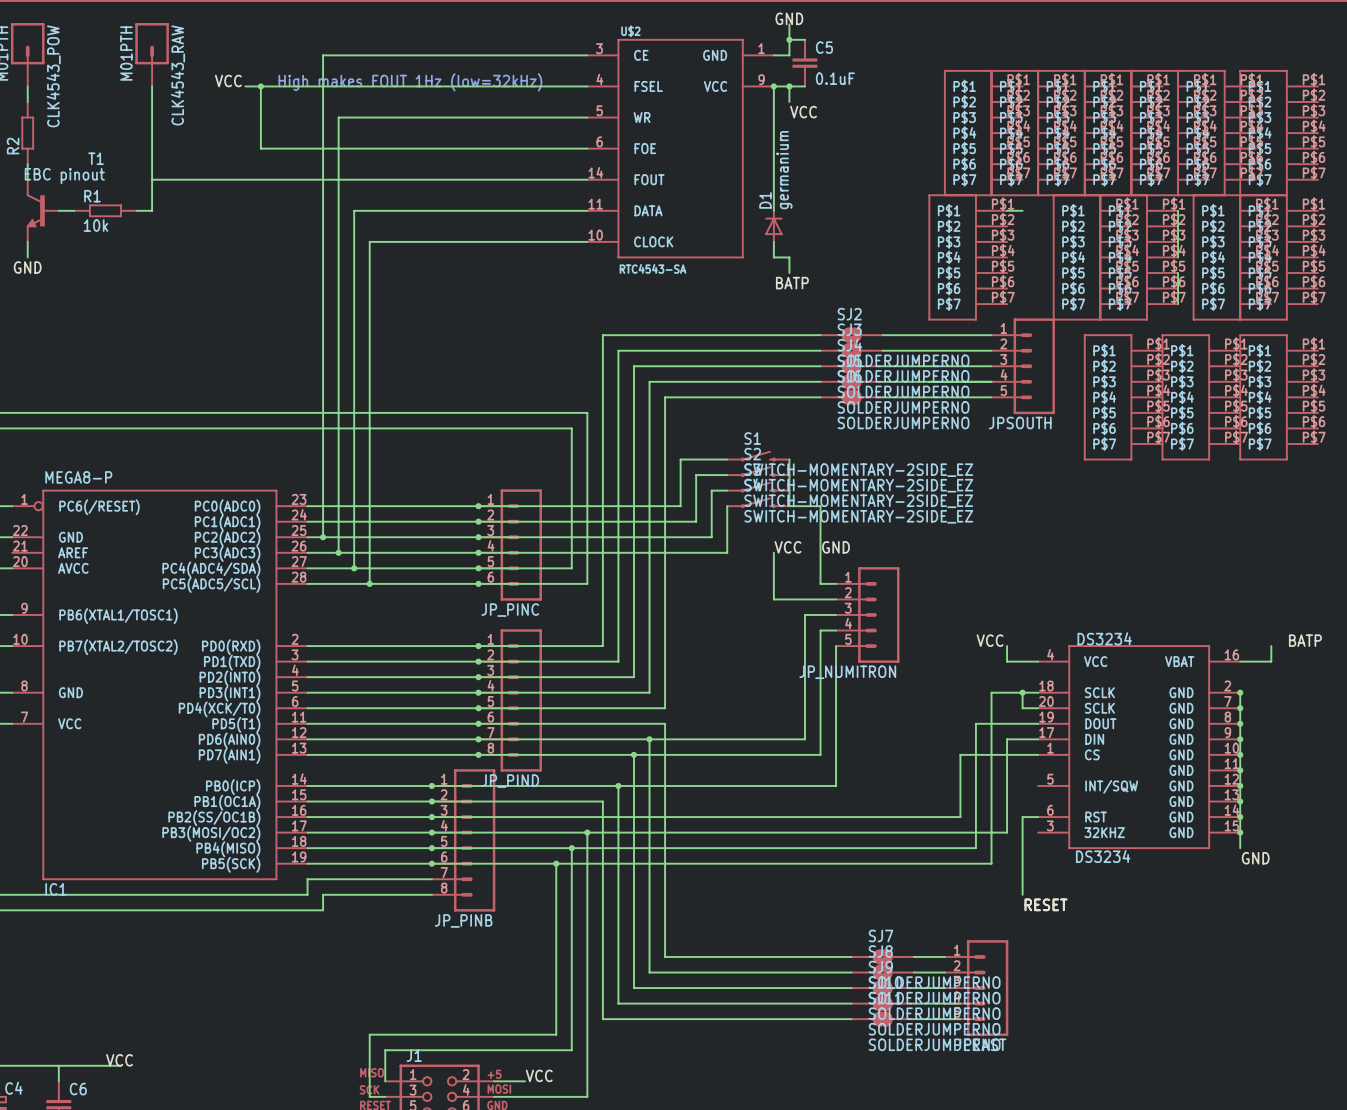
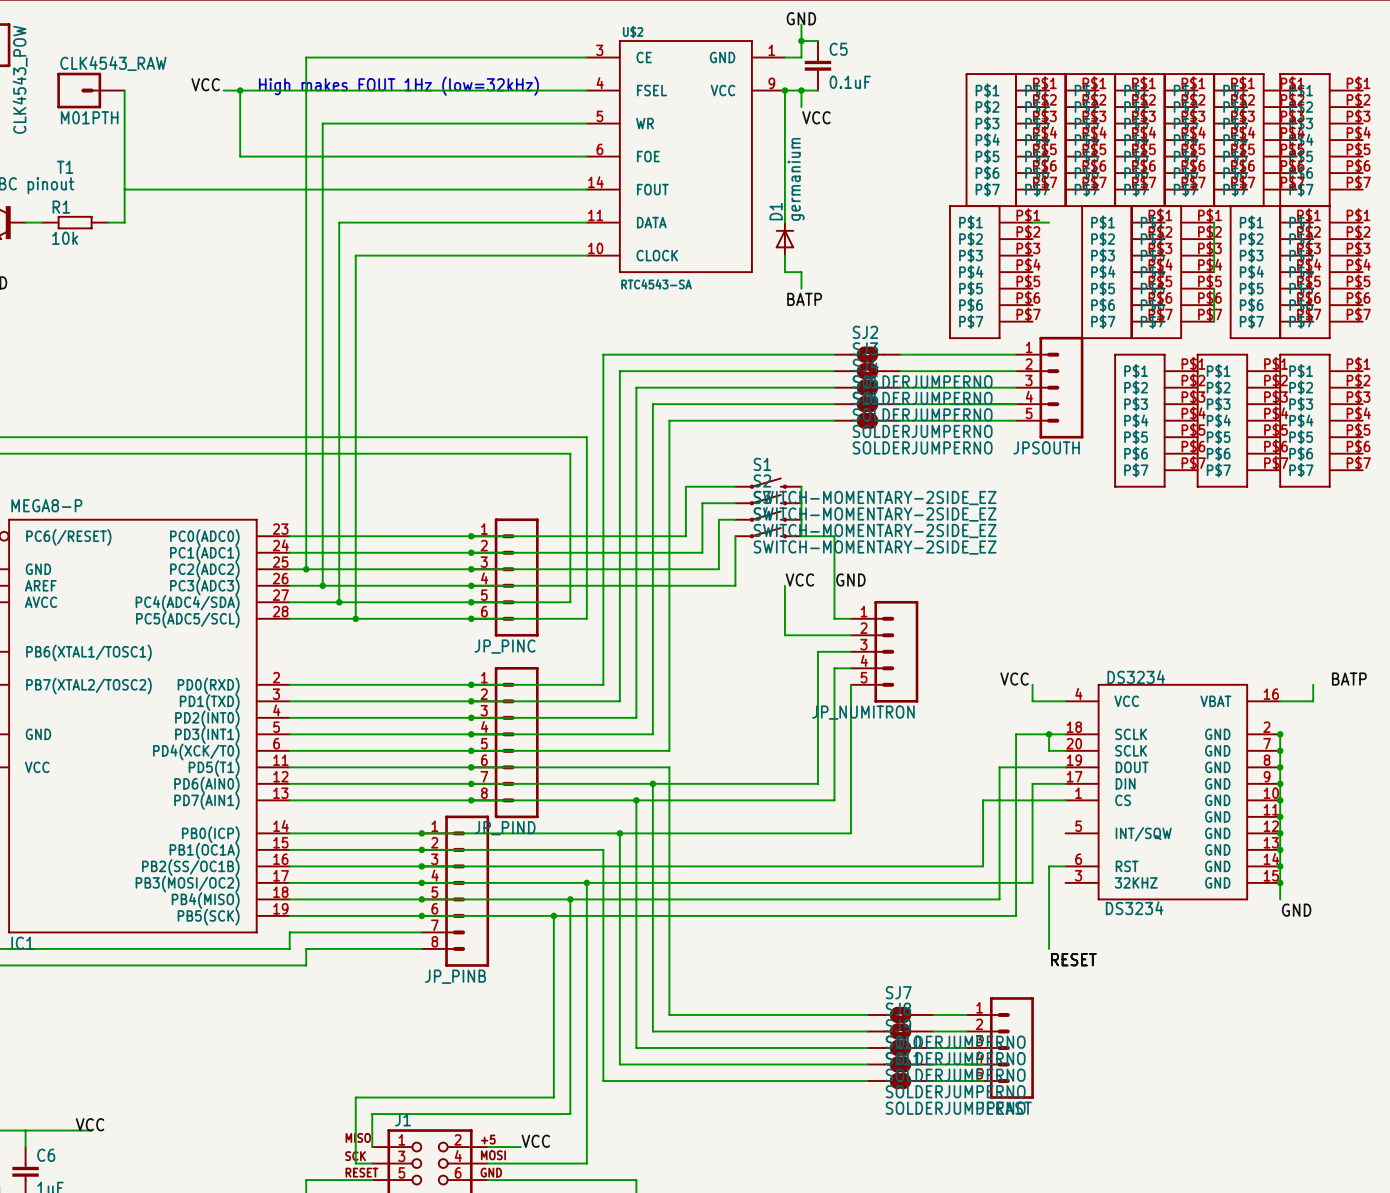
CLK4543_RAW rotation: 0° (152, 43) -> 90° counterclockwise (79, 90)
CLK4543_RAW position: (152, 54) -> (90, 90)

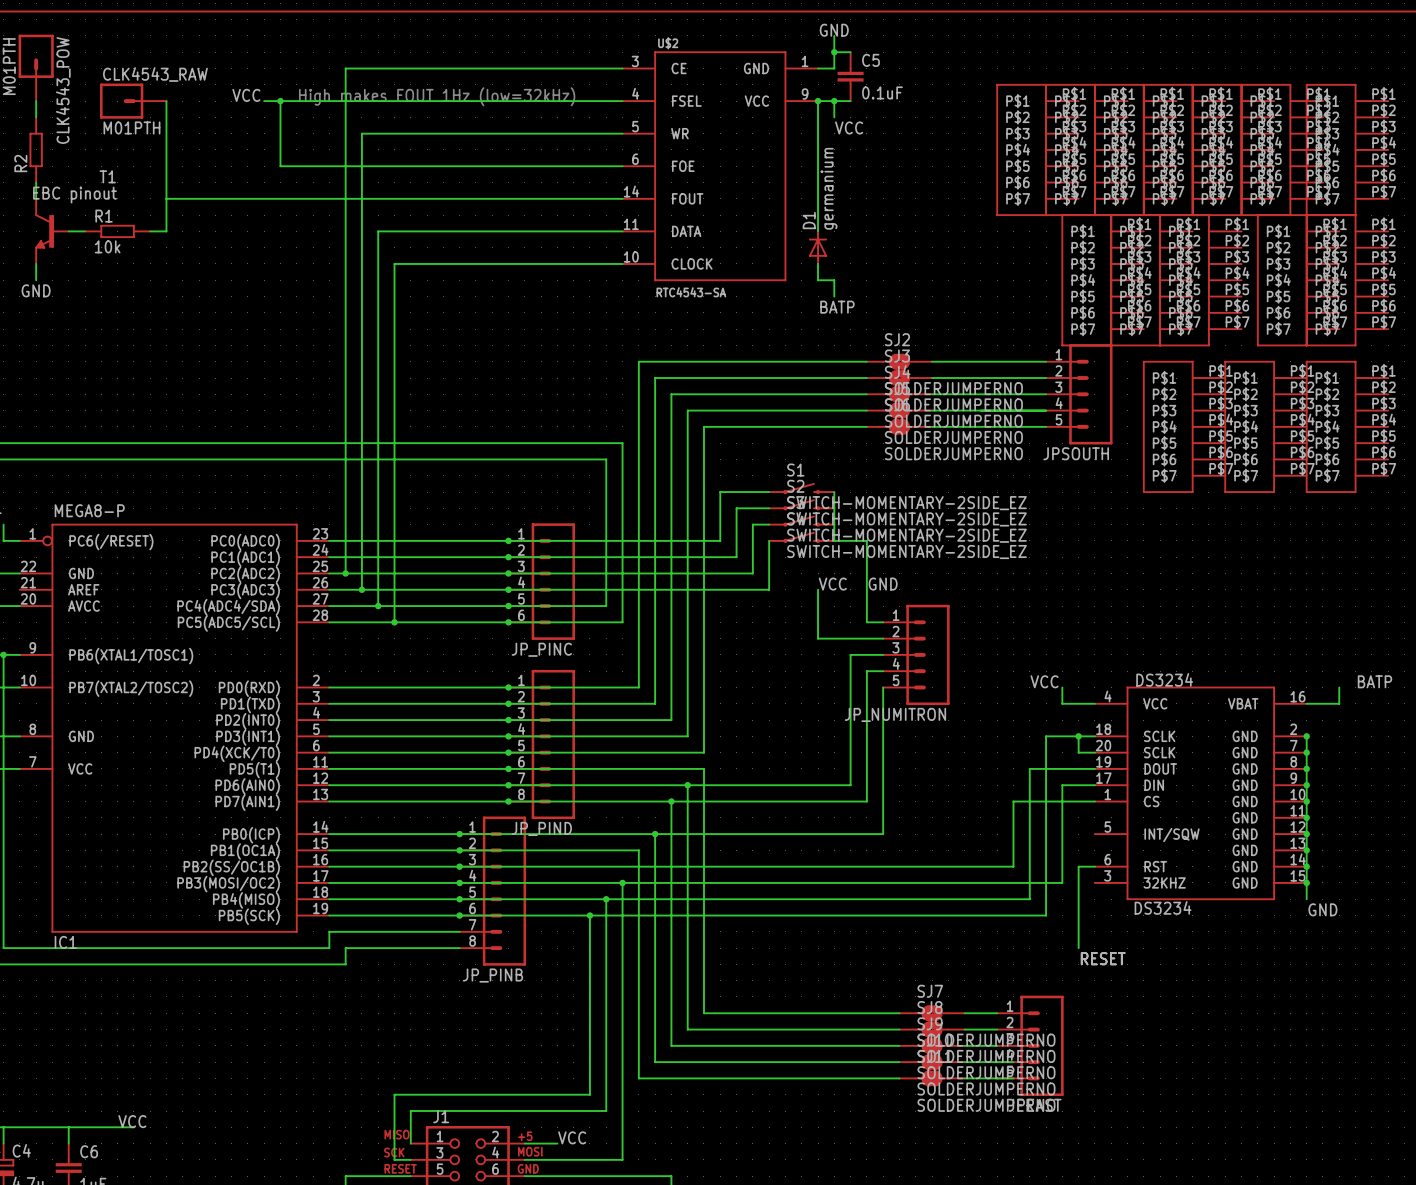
wire: (1032, 222) (1049, 222) -> none
wire: (1214, 222) (1214, 272) -> none
part position: (990, 272) -> (1102, 280)
wire: (1214, 288) (1214, 321) -> none

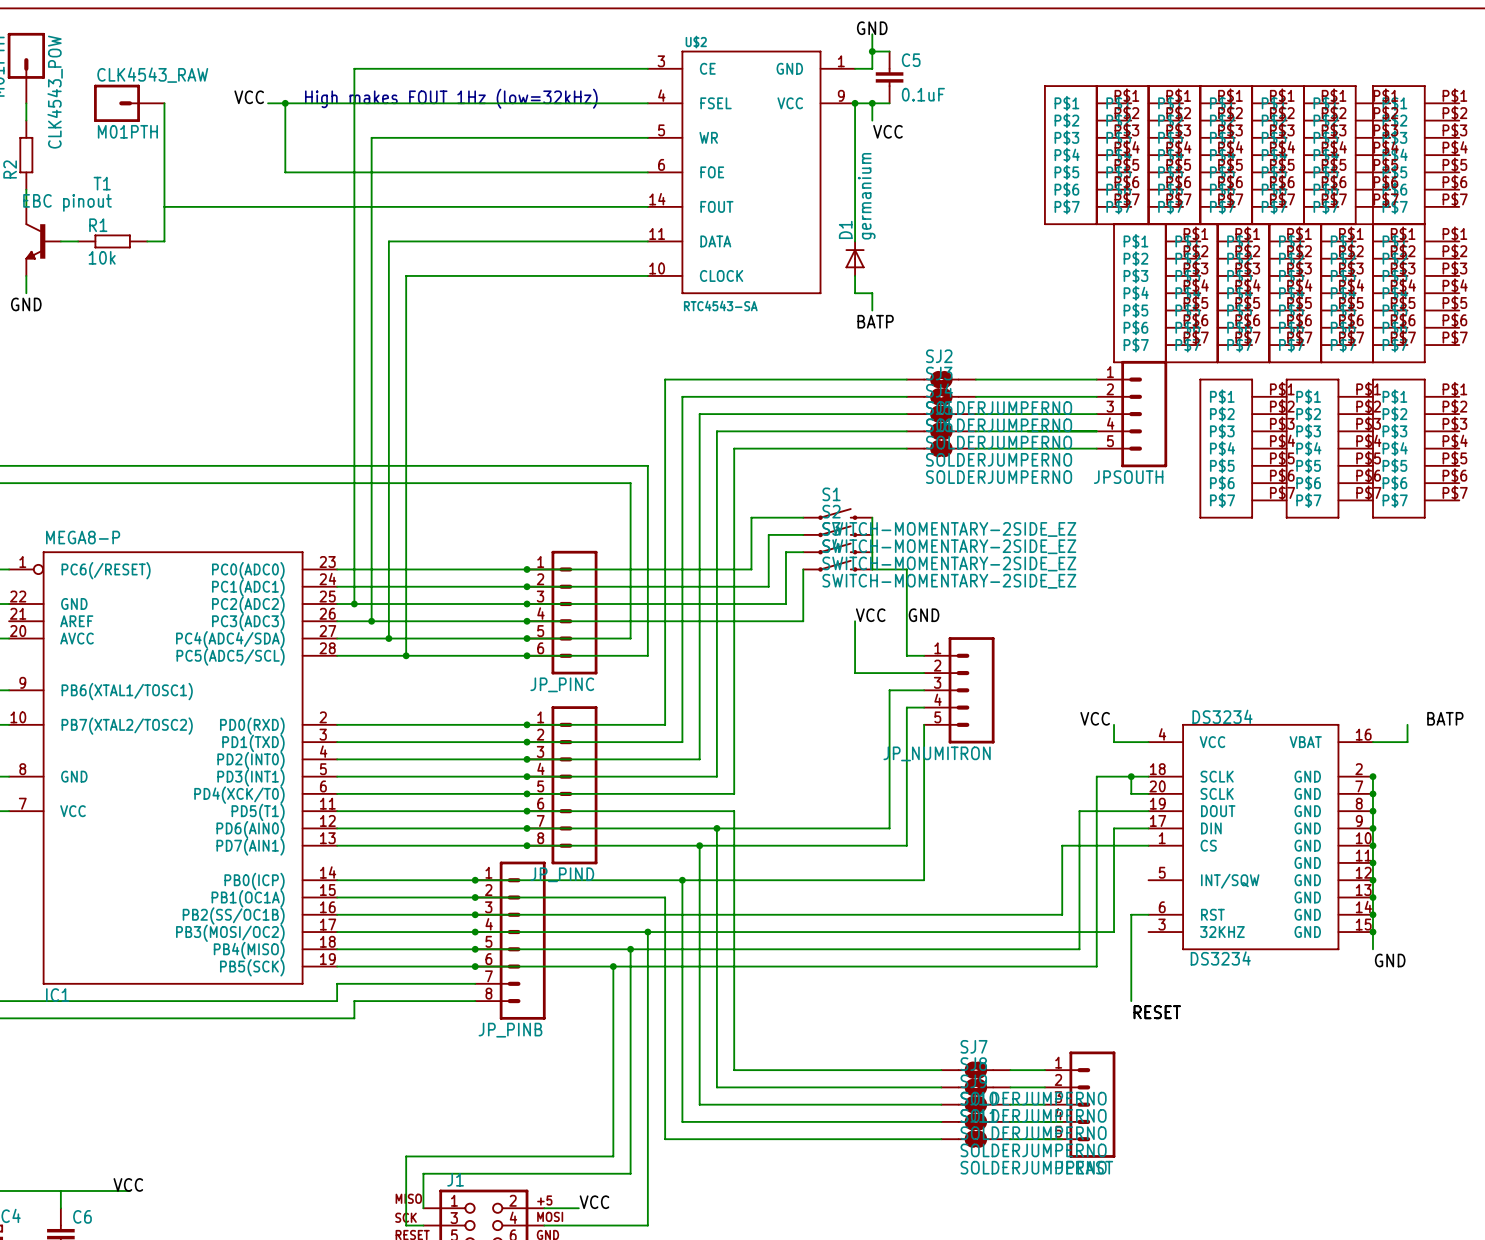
part: none -> (1312, 293)

